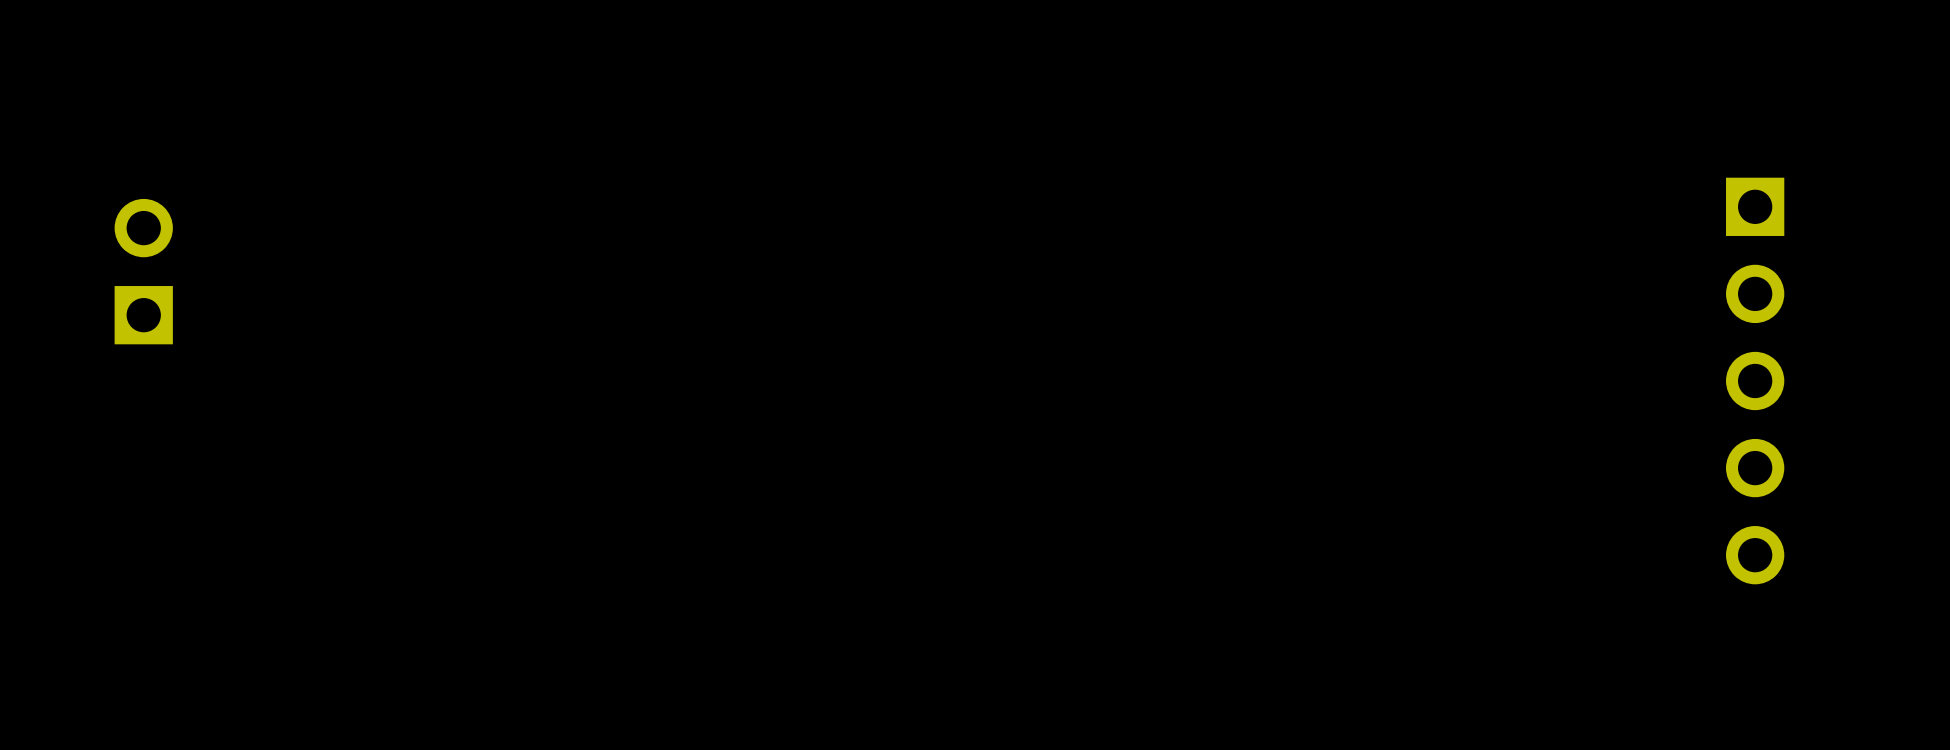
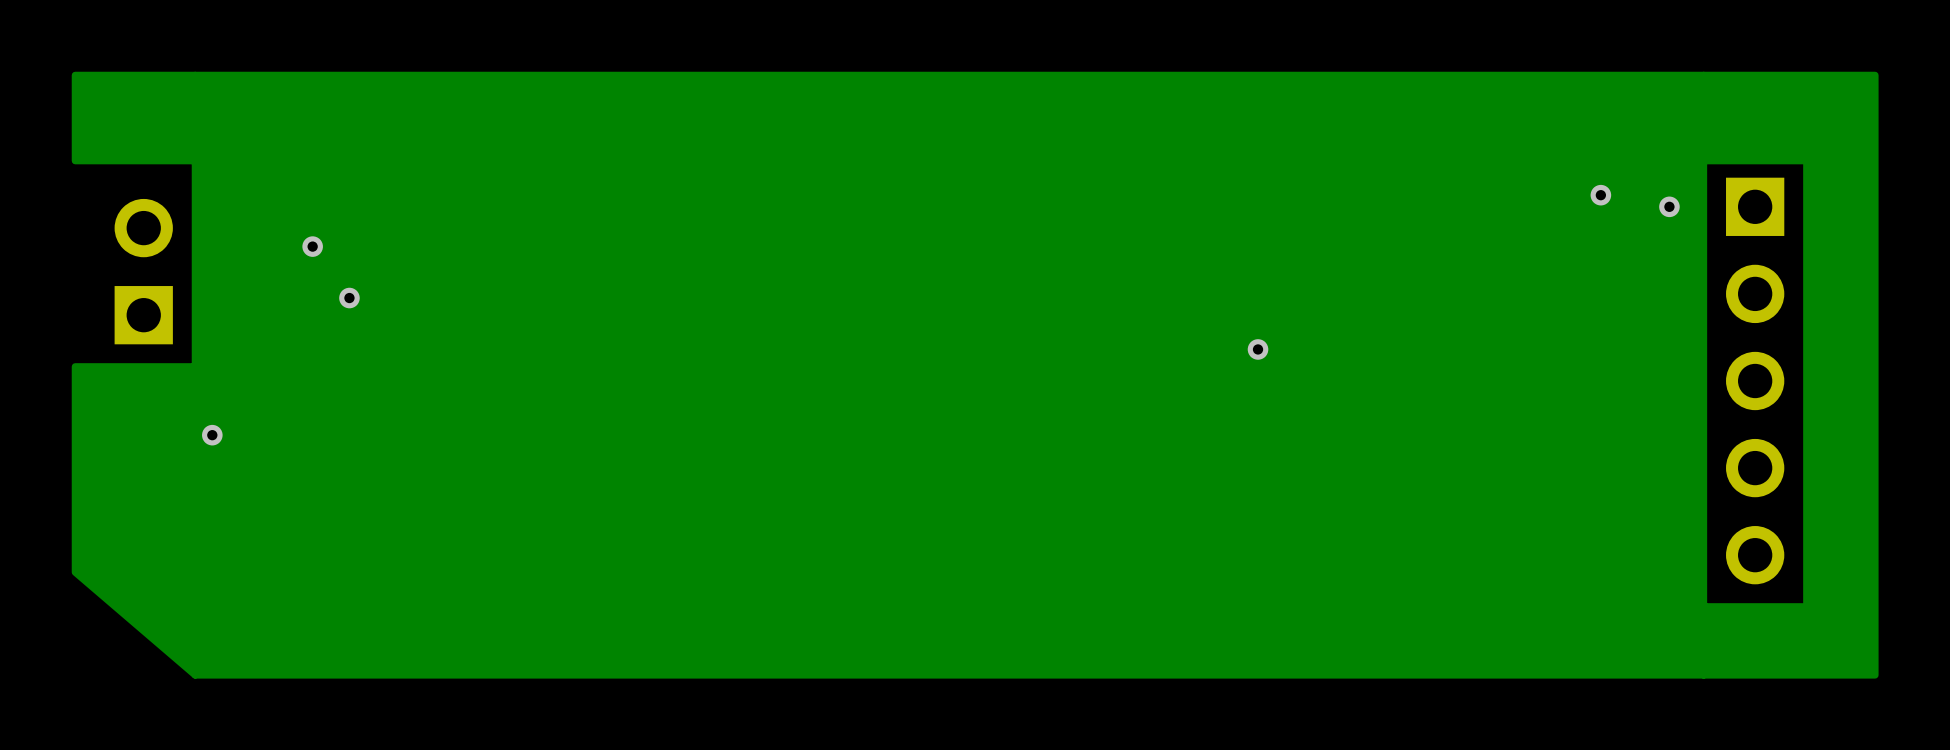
drawing: none -> [71, 71, 1879, 679]
via: none -> (1600, 195)
via: none -> (1669, 206)
via: none -> (312, 246)
via: none -> (349, 298)
via: none -> (1258, 349)
via: none -> (212, 435)

